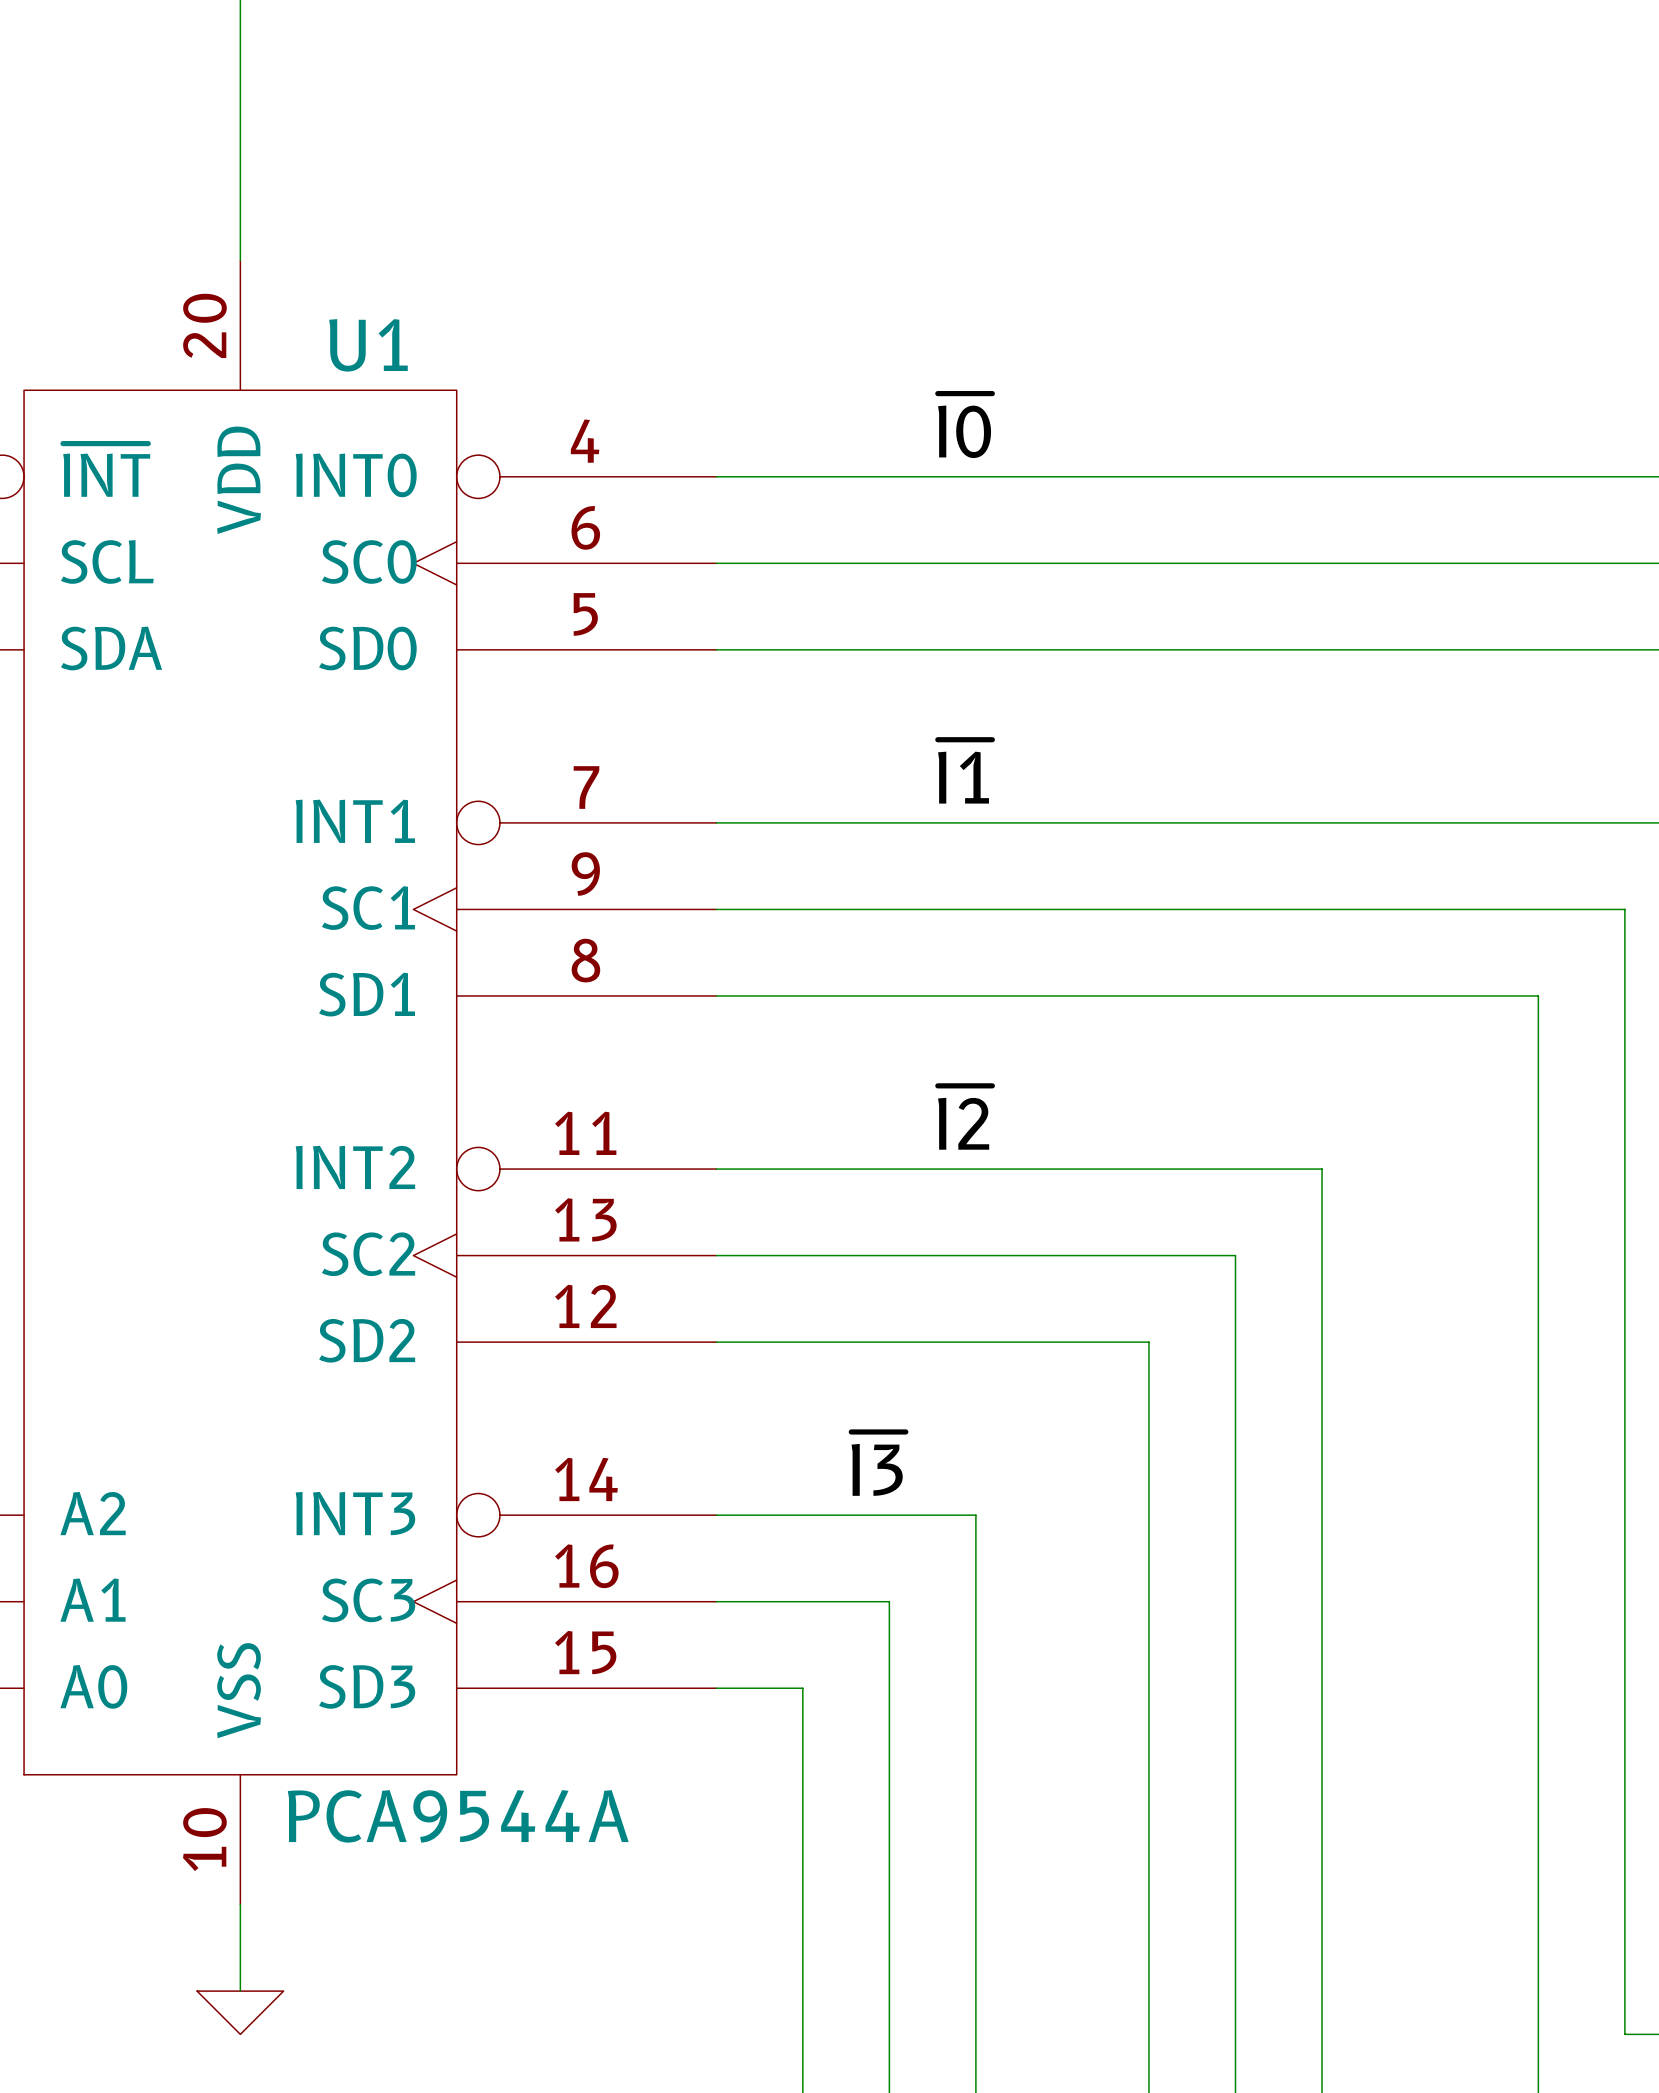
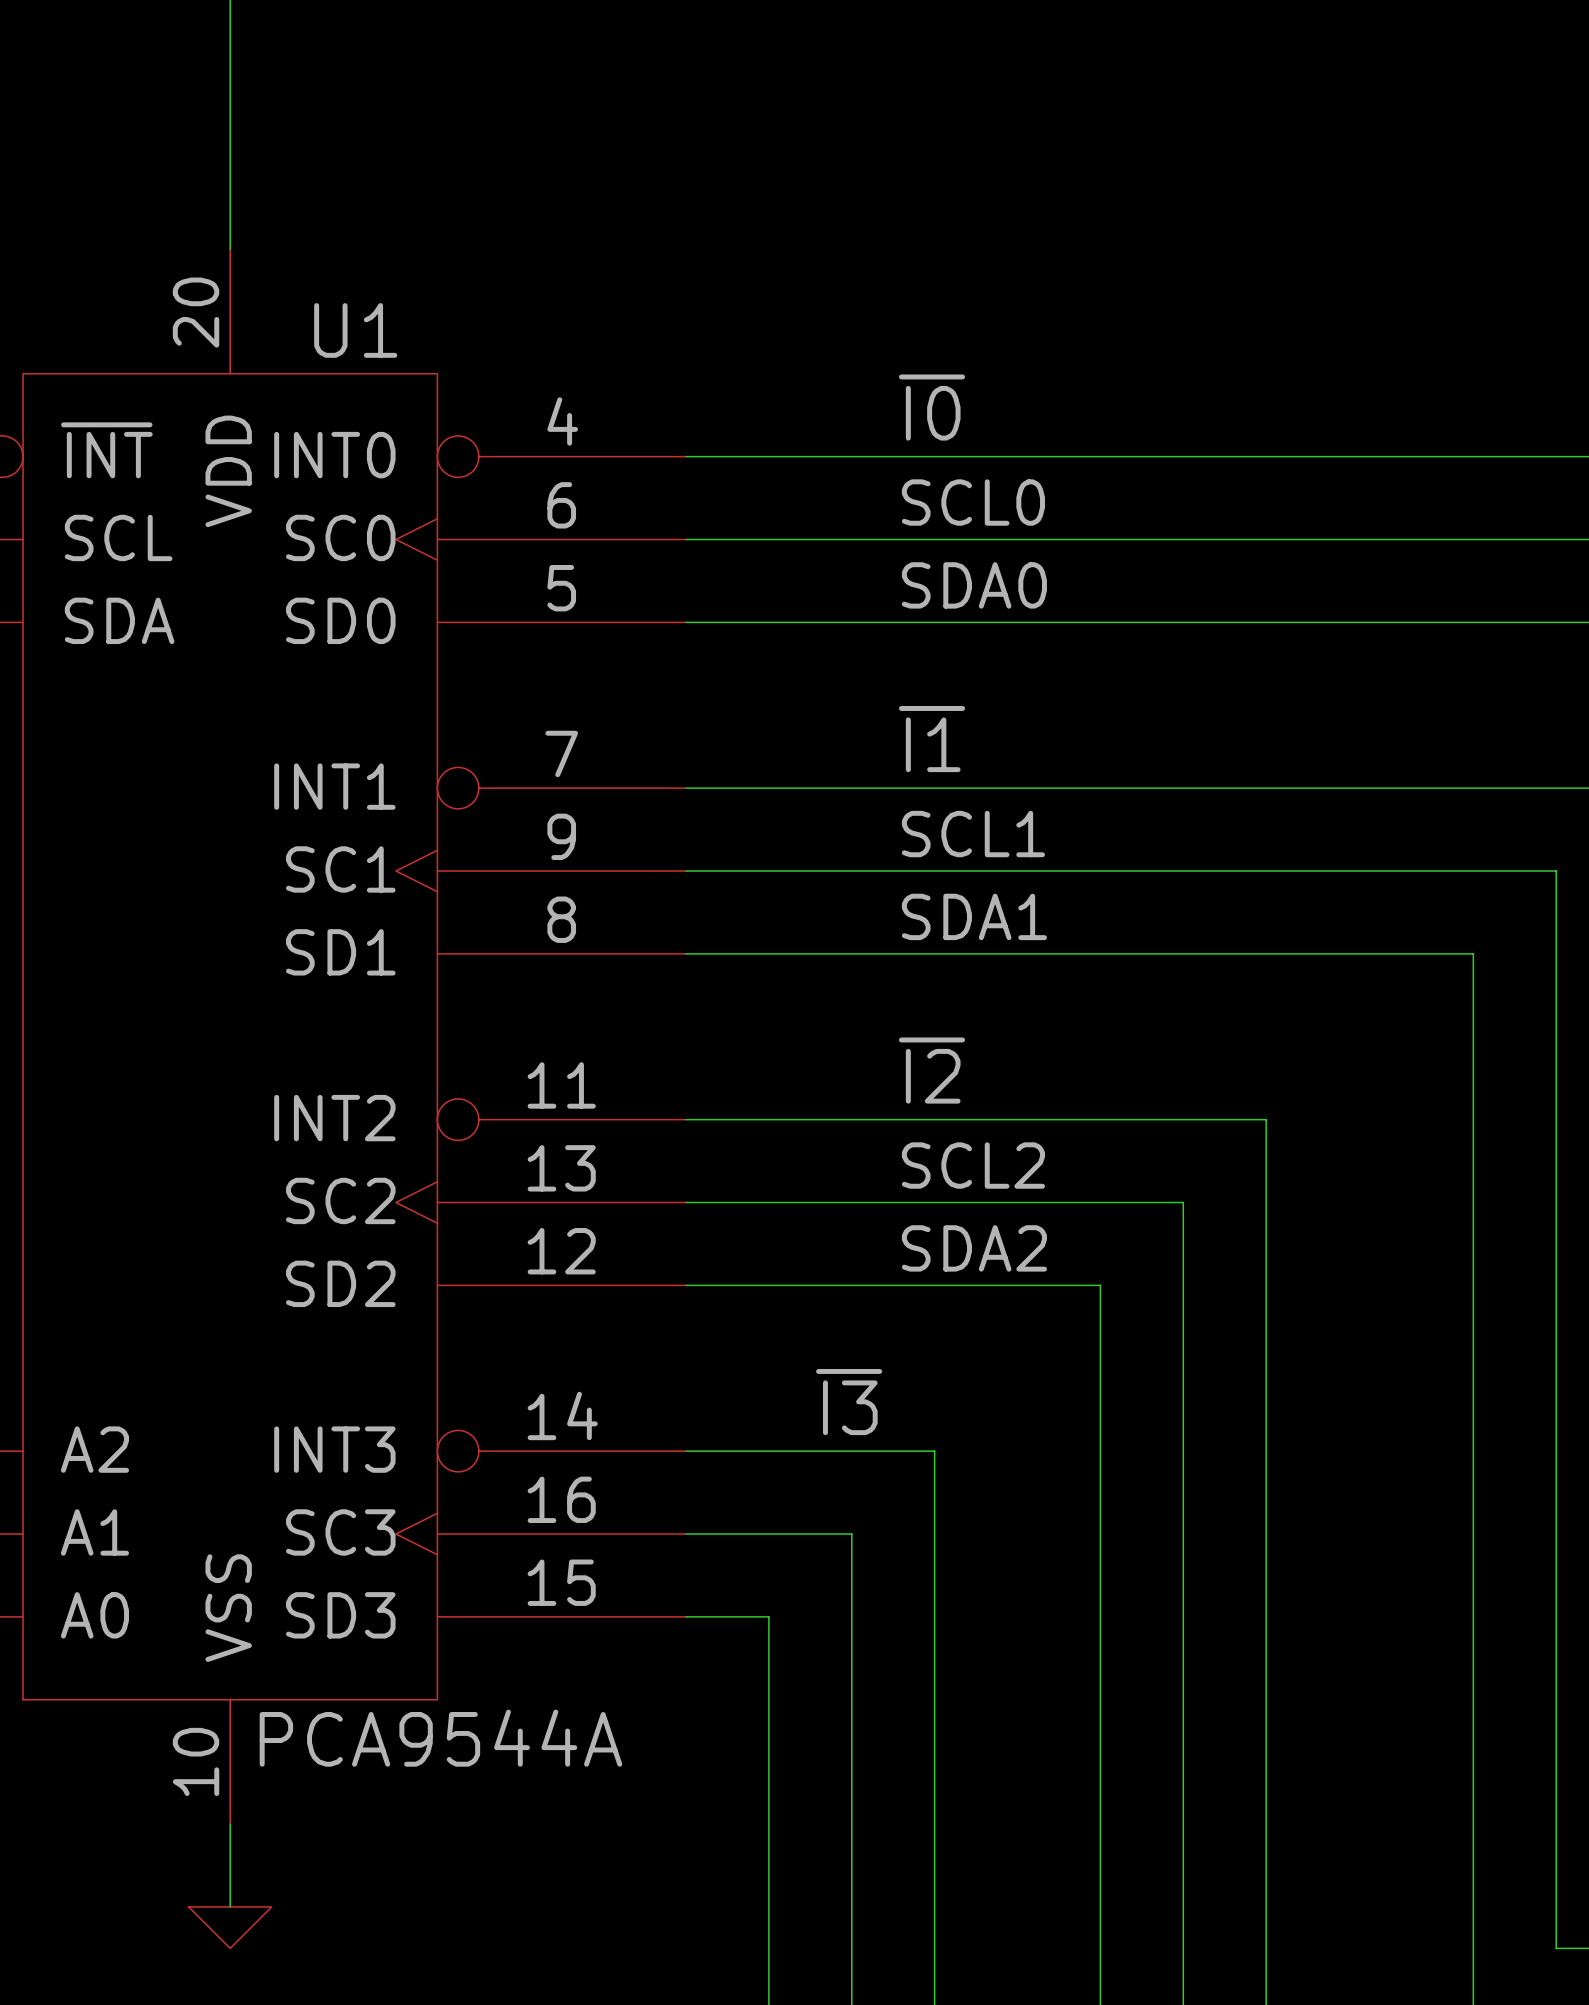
label: none -> SCL0 (973, 502)
label: none -> SDA0 (974, 585)
label: none -> SCL1 (973, 834)
label: none -> SDA1 (974, 916)
label: none -> SCL2 (973, 1165)
label: none -> SDA2 (974, 1248)

